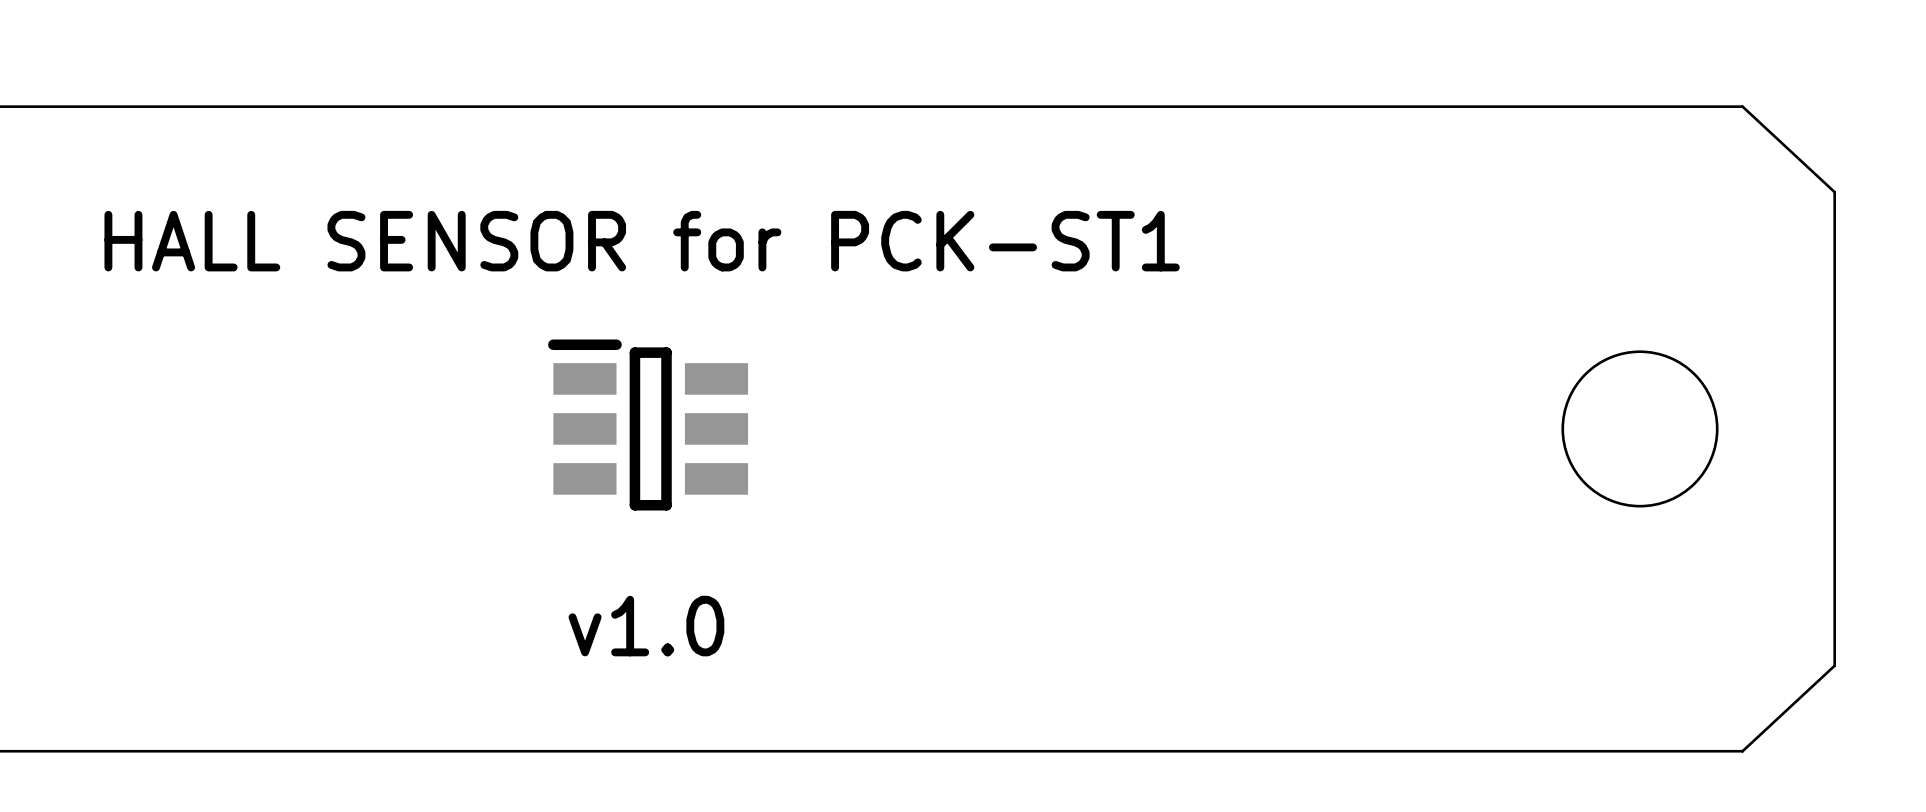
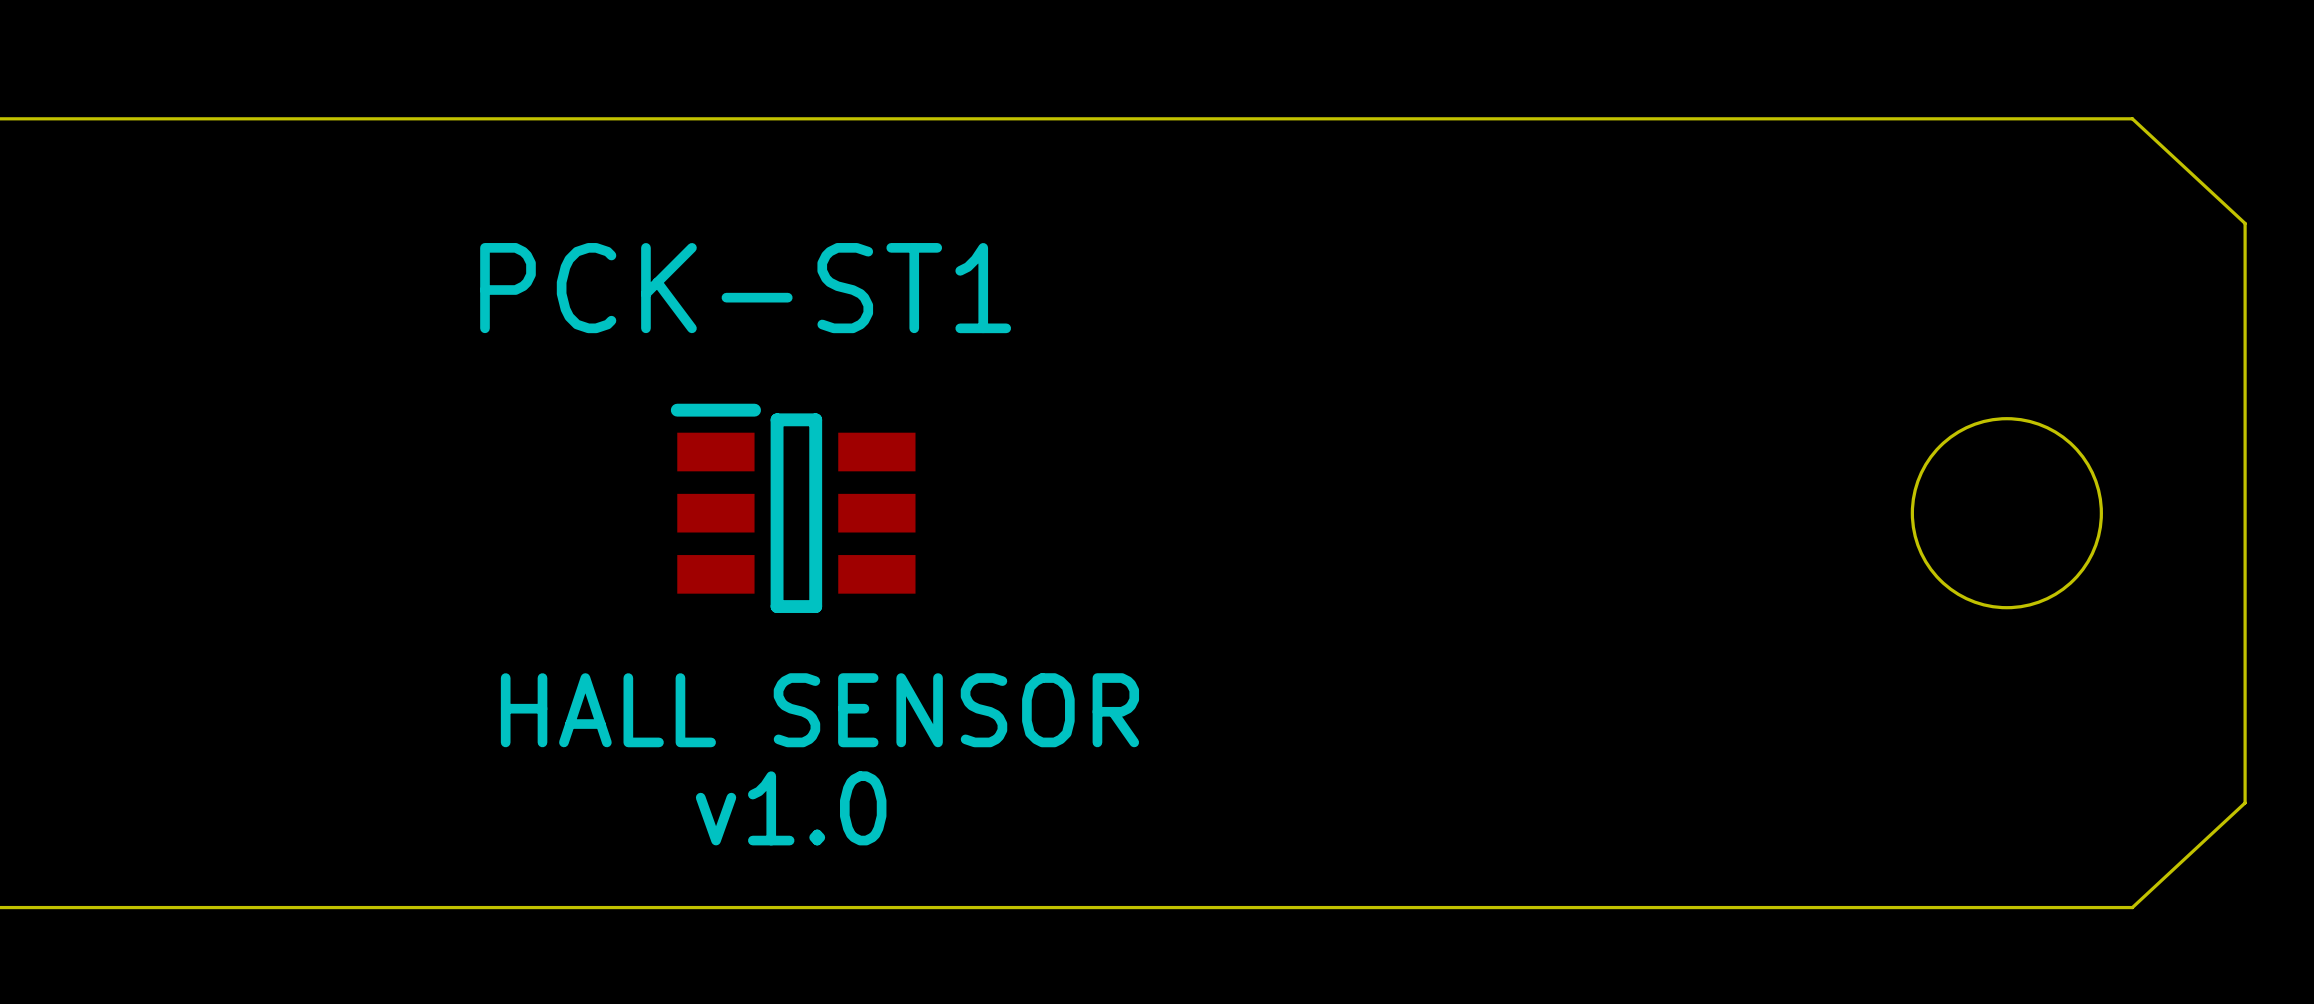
text: HALL SENSOR for PCK-ST1 (642, 241) -> none
text: none -> PCK-ST1 (745, 288)
text: none -> HALL SENSOR (819, 710)
text position: v1.0 (646, 626) -> v1.0 (791, 808)

